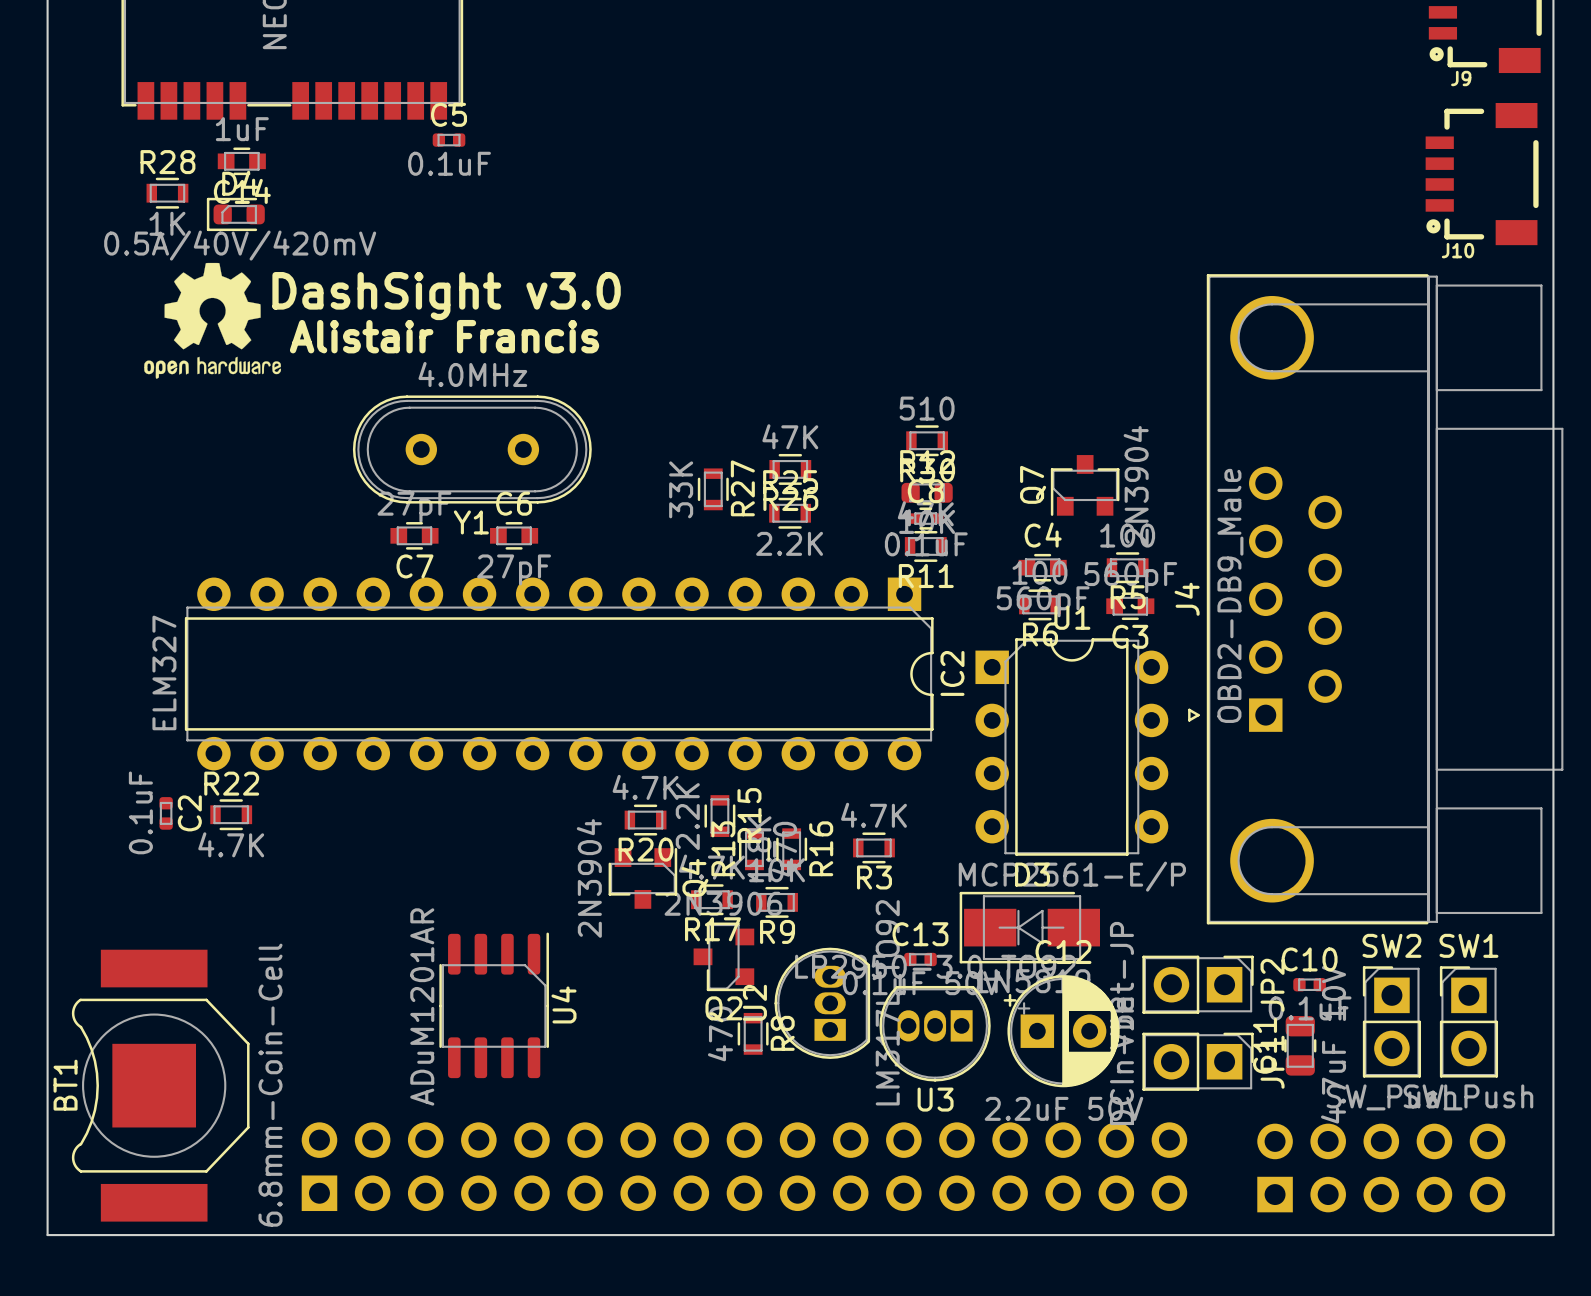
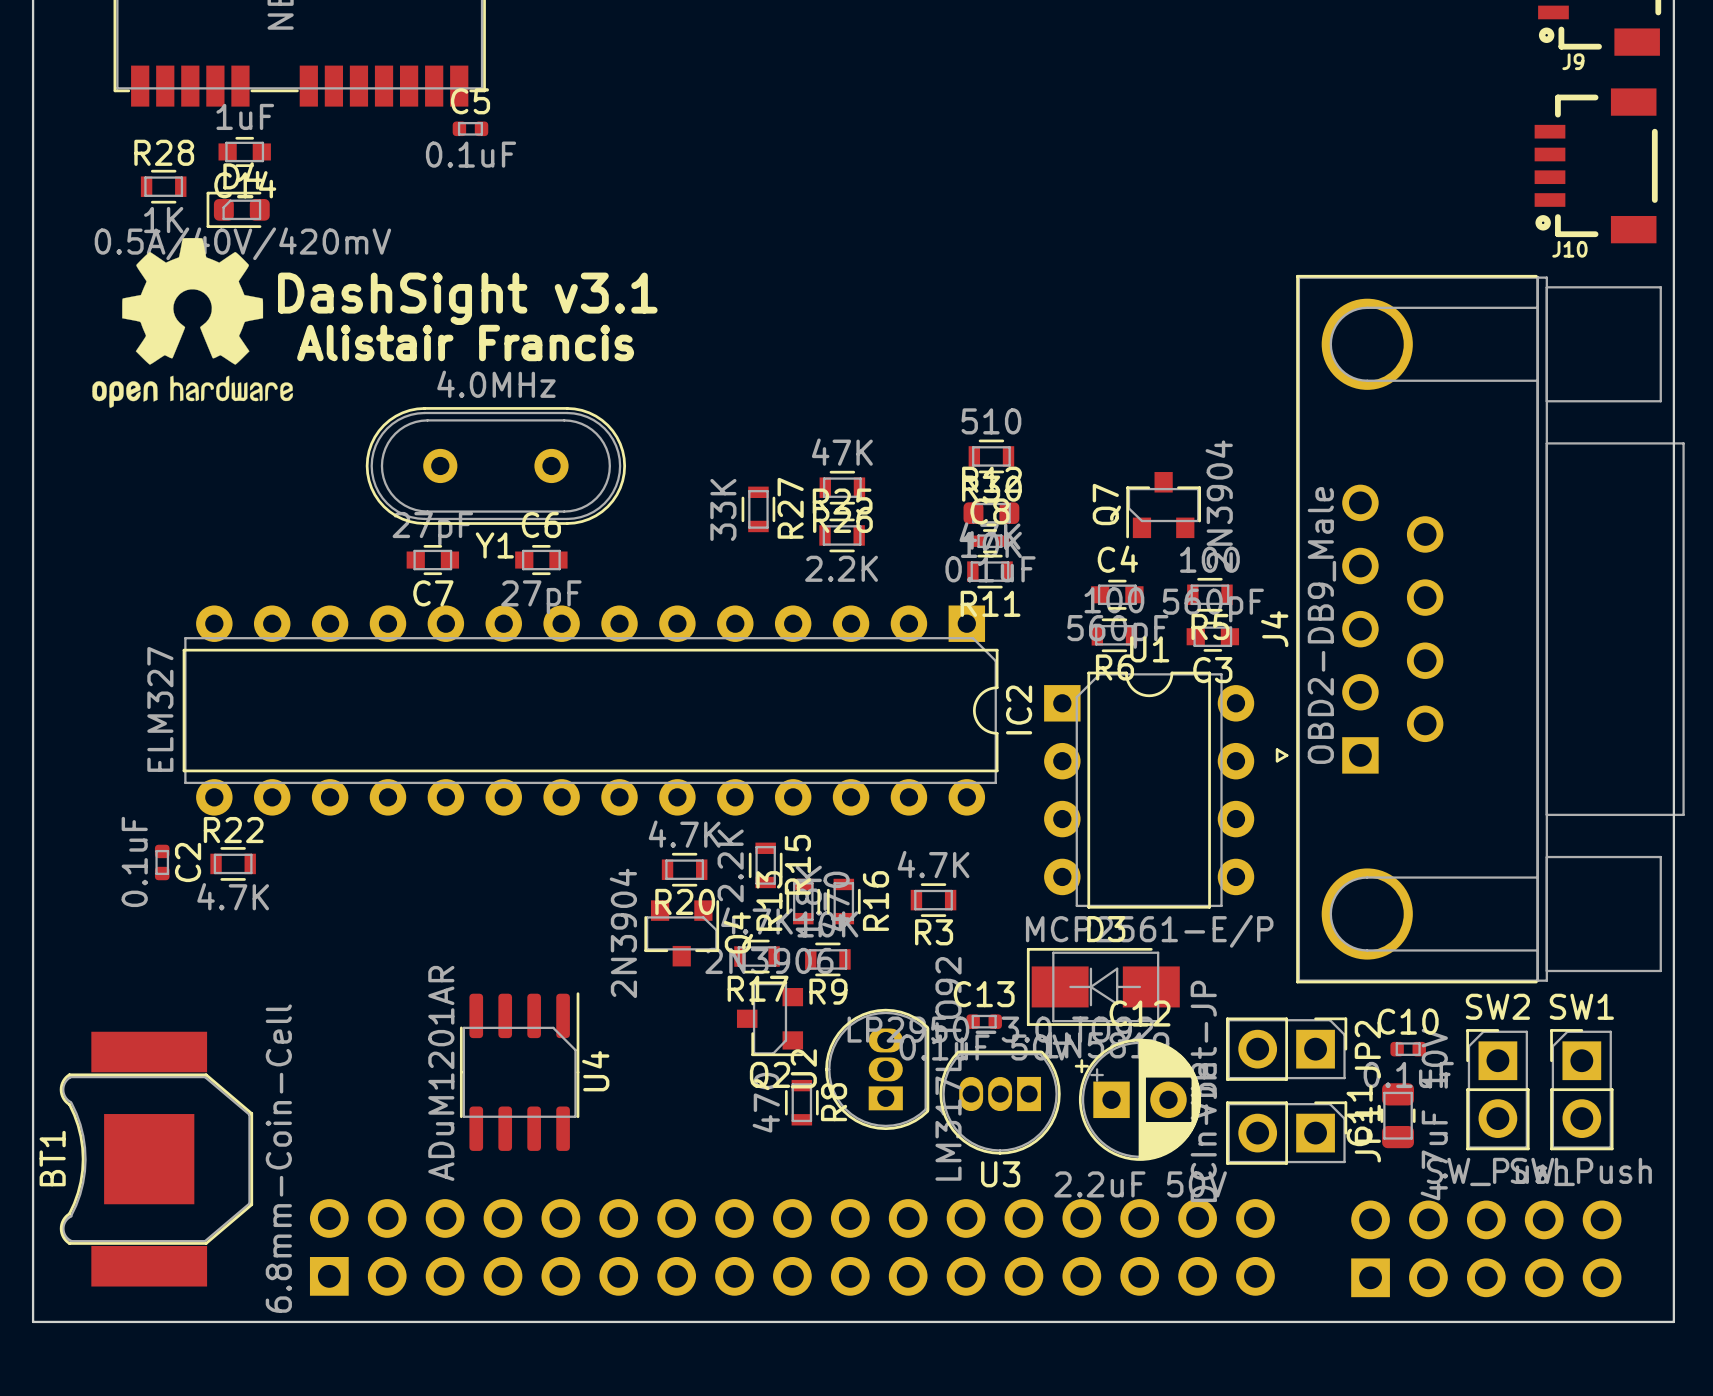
drawing shape: [144, 262, 282, 379] -> [92, 238, 293, 408]
text: DashSight v3.0 (446, 296) -> DashSight v3.1 (467, 298)
BT1 footprint: [71, 949, 250, 1222] -> [59, 1031, 254, 1287]

